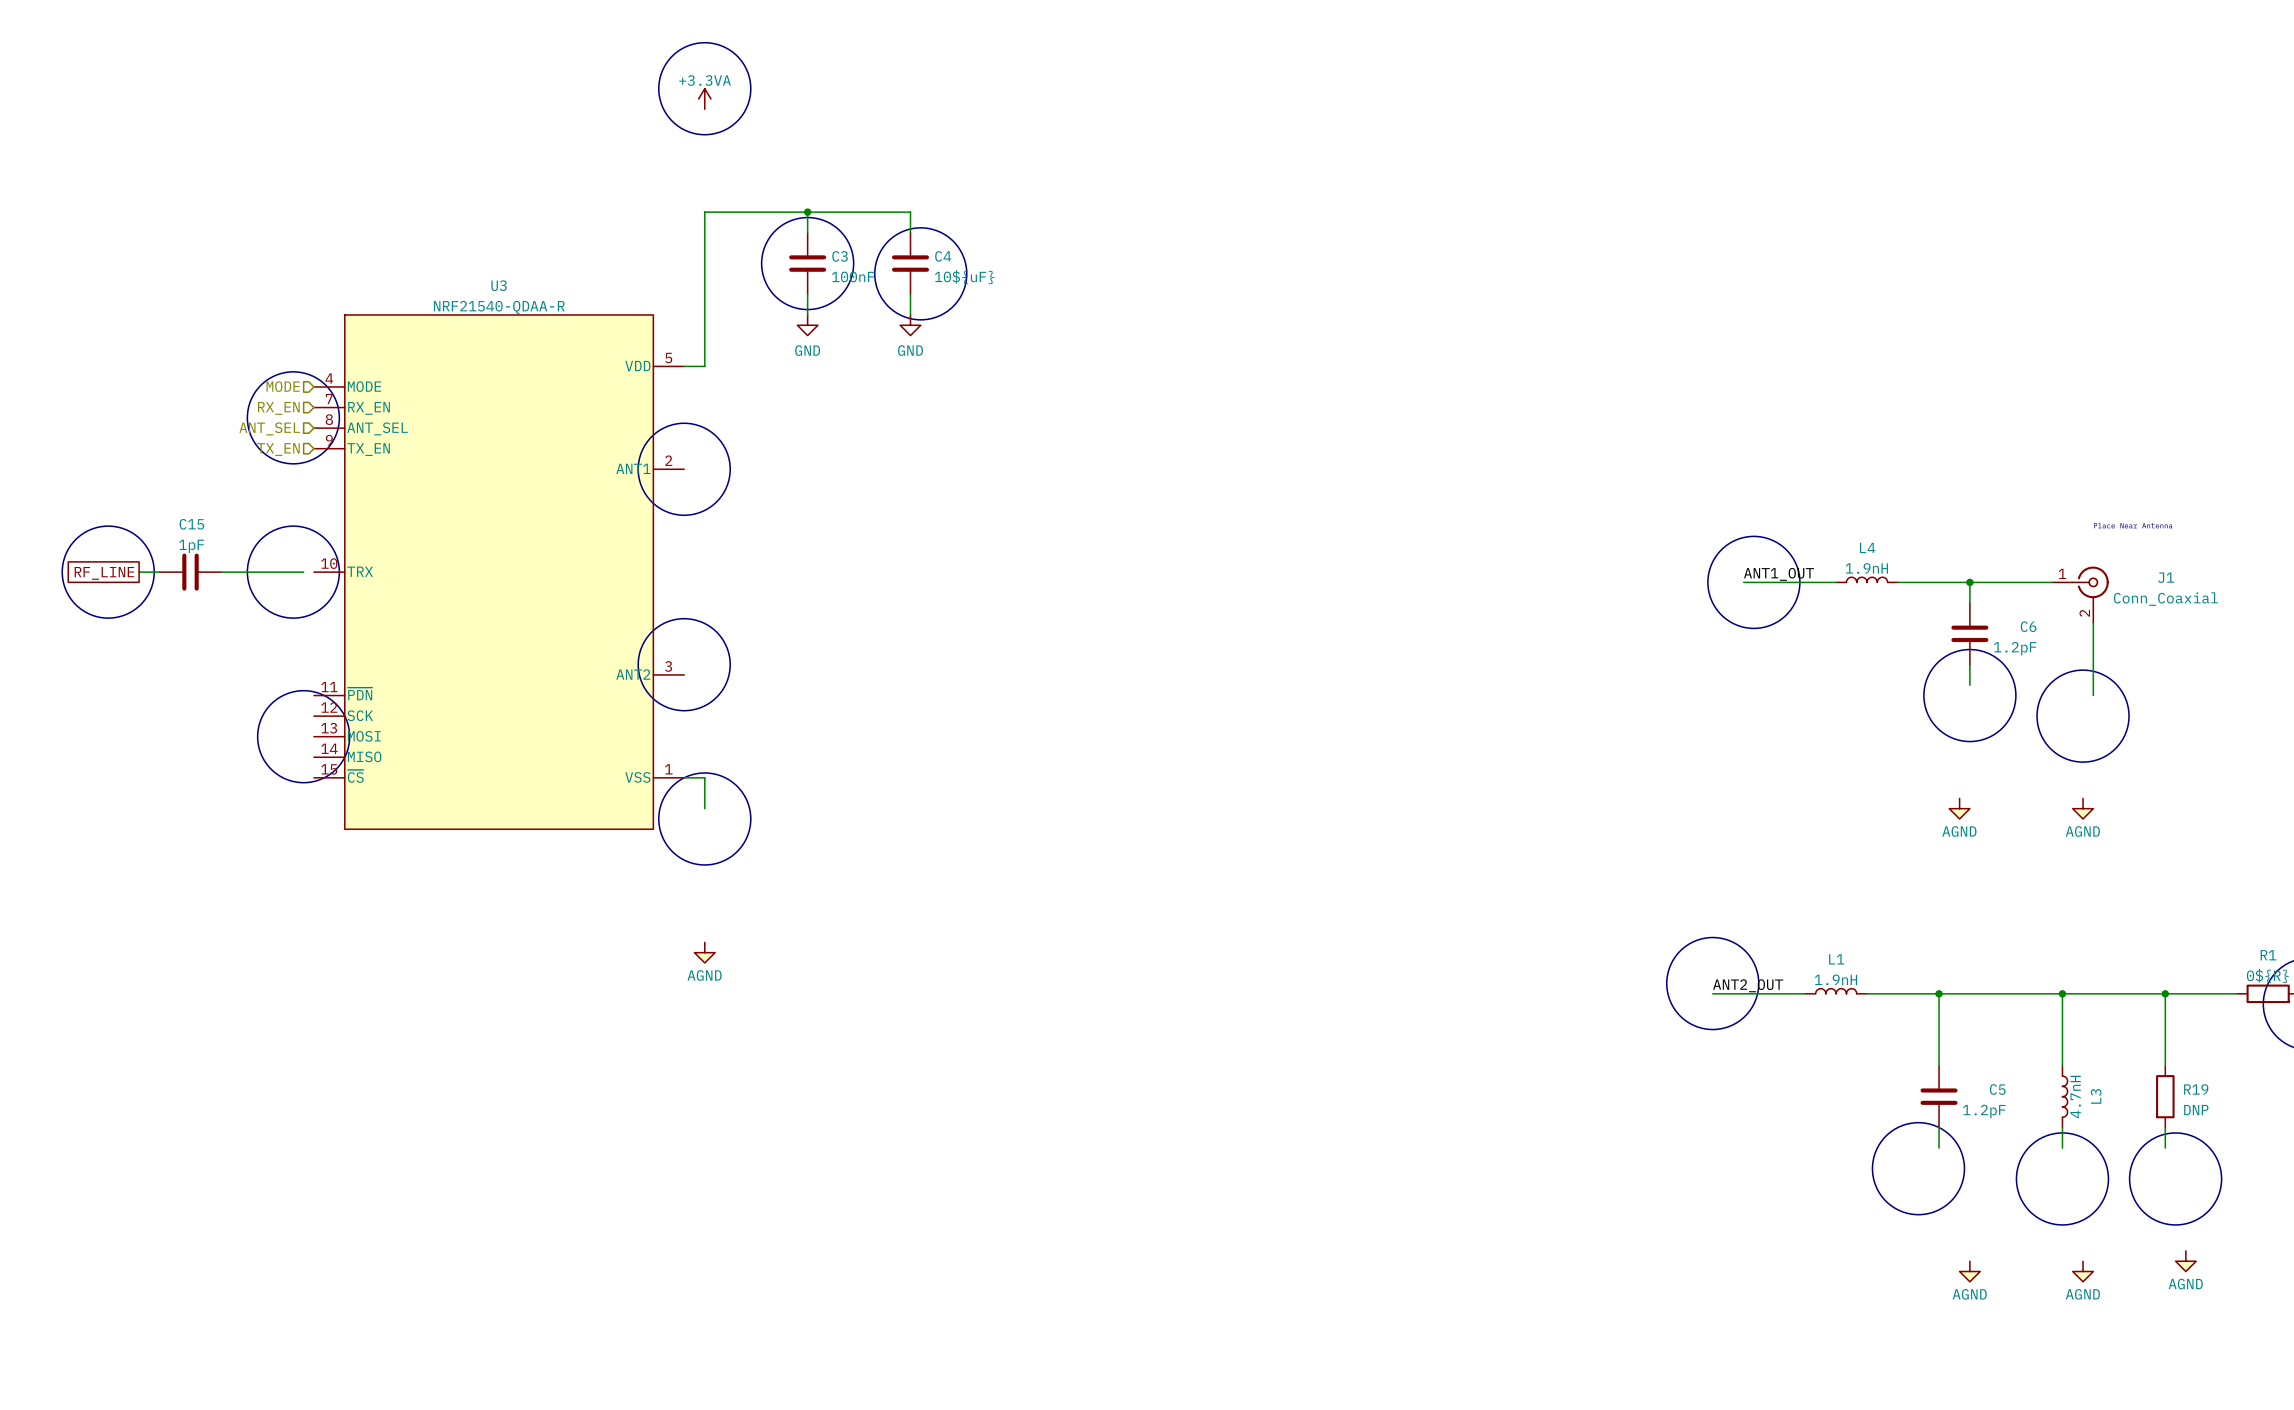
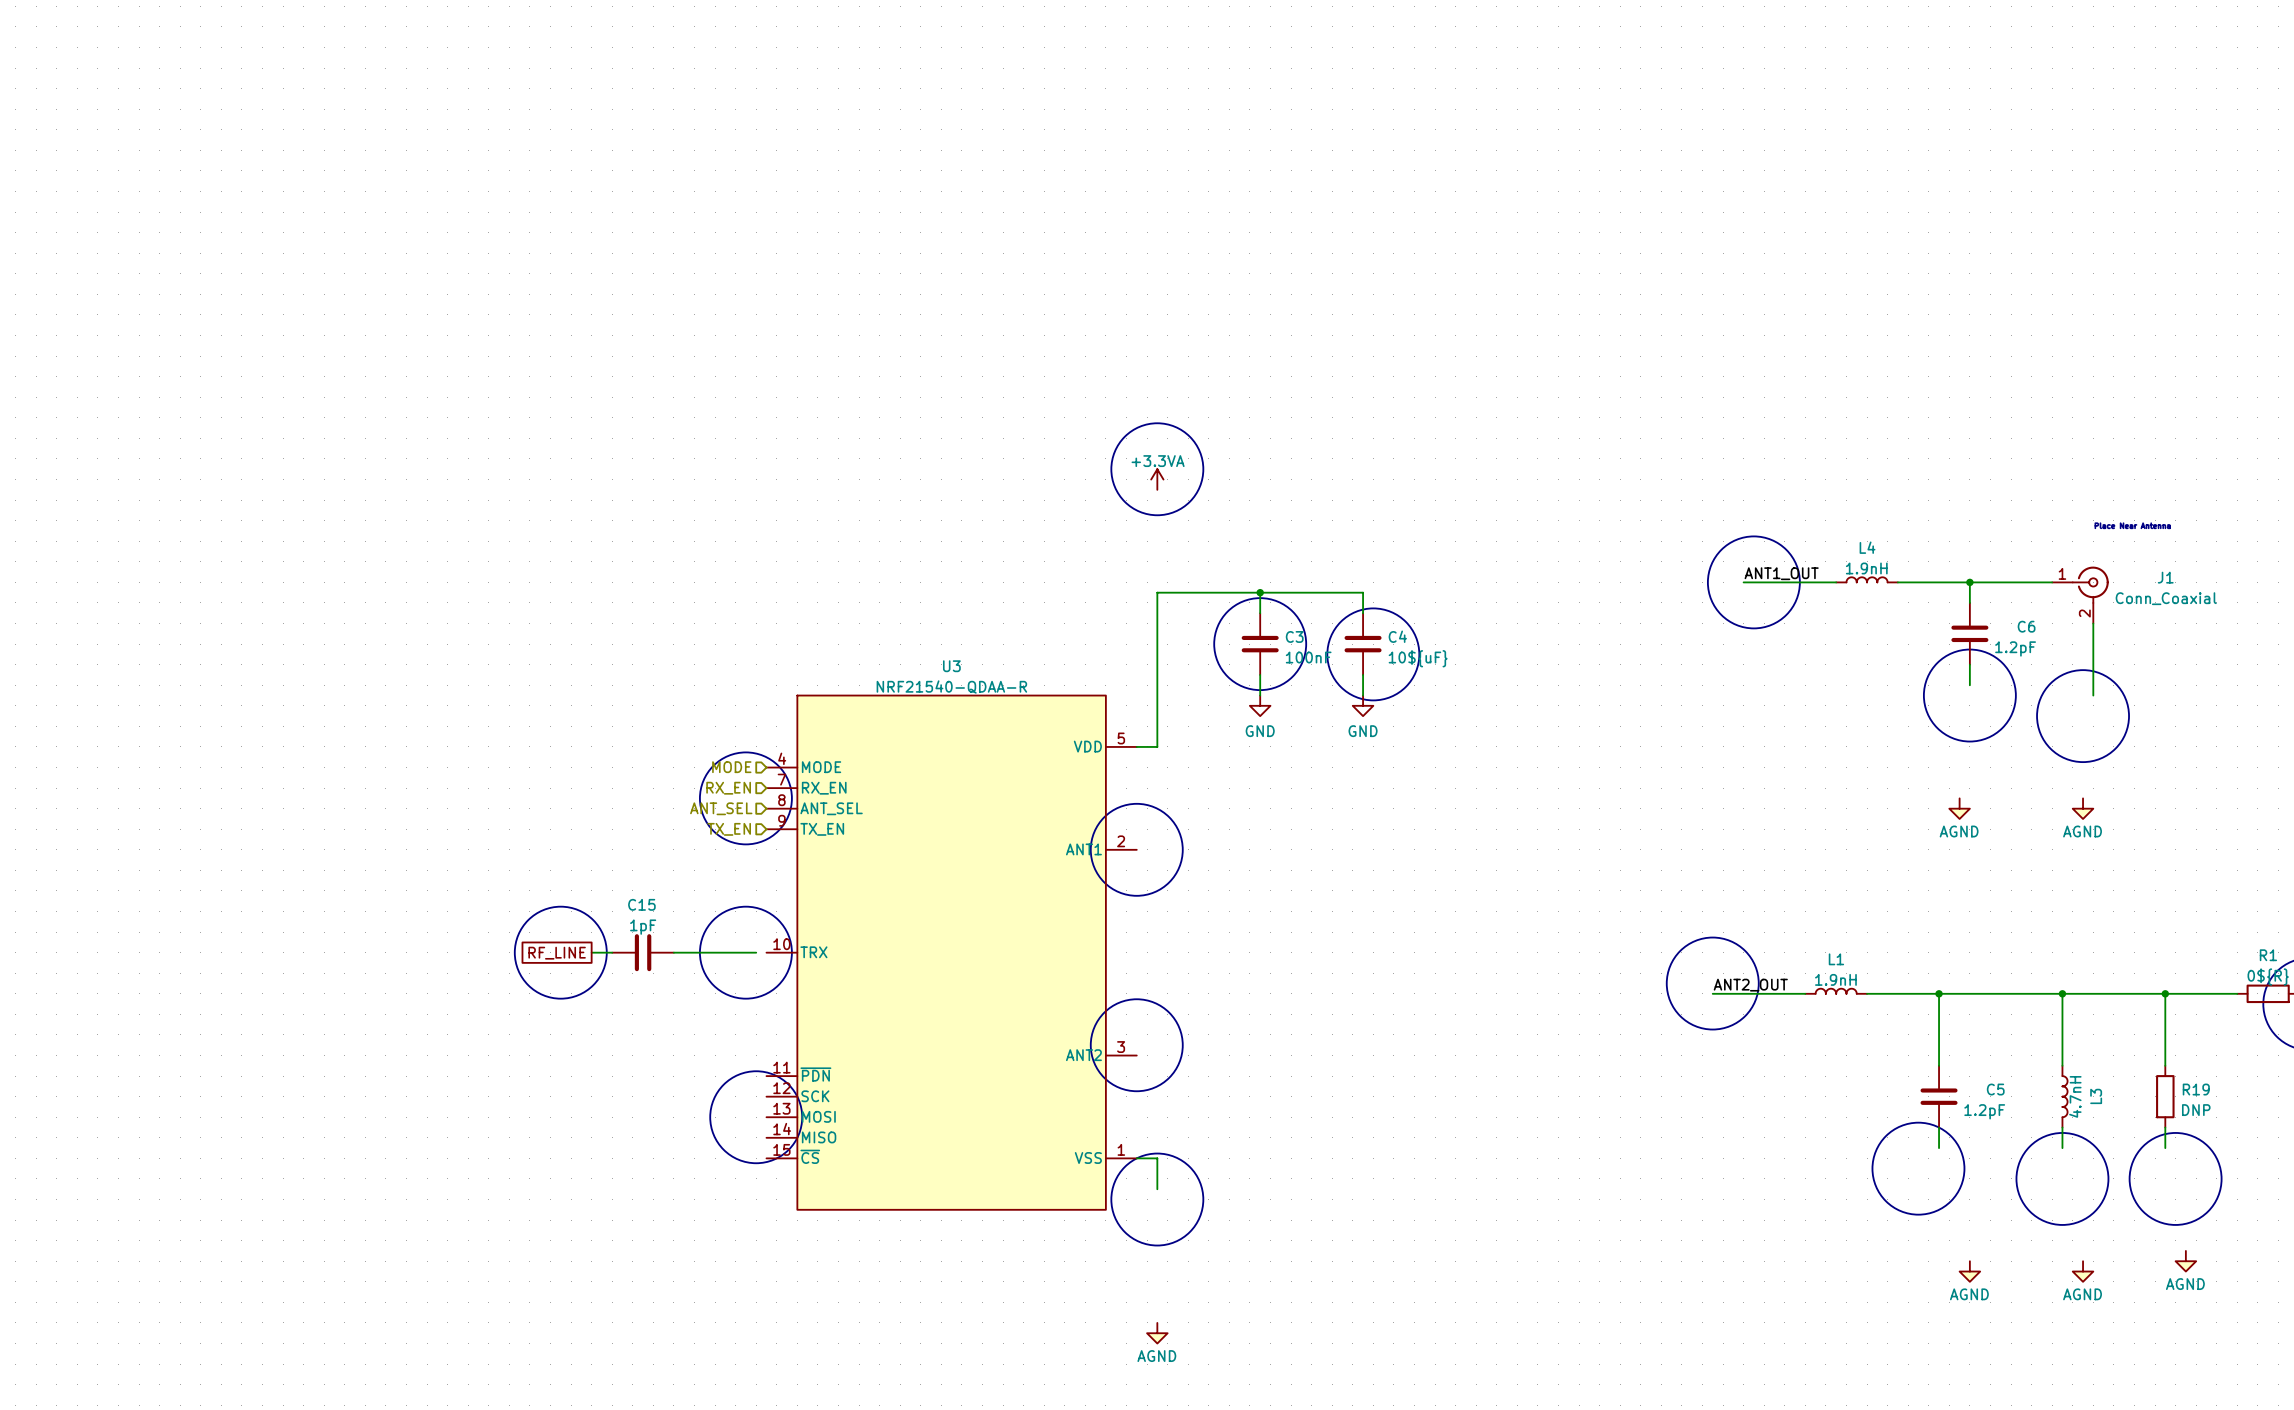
drawing: [658, 42, 751, 135] -> none
power symbol: +3.3VA (704, 98) -> none
wire: (807, 212) (807, 232) -> none
junction: (807, 212) -> none
drawing: [761, 217, 854, 310] -> none
drawing: [874, 227, 967, 320] -> none
wire: (910, 232) (910, 212) (704, 212) (704, 366) (684, 366) -> none
C3 position: (807, 263) -> (1260, 644)
C4 position: (910, 263) -> (1363, 644)
wire: (807, 294) (807, 314) -> none
wire: (910, 294) (910, 314) -> none
power symbol: GND (807, 325) -> none
power symbol: GND (910, 325) -> none
drawing: [247, 371, 340, 464] -> none
hierarchical label: MODE (283, 386) -> none
hierarchical label: RX_EN (278, 408) -> none
drawing: [638, 423, 731, 516] -> none
drawing: none -> [1111, 423, 1204, 516]
hierarchical label: ANT_SEL (269, 428) -> none
hierarchical label: TX_EN (278, 449) -> none
power symbol: none -> +3.3VA (1157, 479)
drawing: [62, 526, 155, 619] -> none
drawing: [247, 526, 340, 619] -> none
wire: (139, 572) (159, 572) -> none
C15 position: (190, 572) -> (643, 952)
wire: (221, 572) (303, 572) -> none
U3 position: (499, 572) -> (951, 952)
global label: RF_LINE (104, 573) -> none
wire: none -> (1260, 592) (1260, 613)
junction: none -> (1260, 592)
drawing: none -> [1214, 598, 1307, 691]
drawing: none -> [1327, 608, 1420, 701]
wire: none -> (1363, 613) (1363, 592) (1157, 592) (1157, 746) (1136, 746)
drawing: [638, 618, 731, 711] -> none
wire: none -> (1260, 674) (1260, 695)
wire: none -> (1363, 674) (1363, 695)
drawing: [257, 690, 350, 783] -> none
power symbol: none -> GND (1260, 705)
power symbol: none -> GND (1363, 705)
hierarchical label: none -> MODE (731, 767)
wire: (684, 777) (704, 777) (704, 808) -> none
hierarchical label: none -> RX_EN (728, 788)
drawing: none -> [1090, 803, 1183, 896]
hierarchical label: none -> ANT_SEL (721, 808)
drawing position: (704, 818) -> (745, 798)
hierarchical label: none -> TX_EN (729, 829)
drawing: none -> [514, 906, 607, 999]
drawing: none -> [699, 906, 792, 999]
wire: none -> (591, 952) (612, 952)
wire: none -> (673, 952) (756, 952)
power symbol: AGND (704, 952) -> none
global label: none -> RF_LINE (557, 953)
drawing: none -> [1090, 999, 1183, 1092]
drawing: none -> [710, 1071, 803, 1164]
drawing: none -> [1111, 1153, 1204, 1246]
wire: none -> (1136, 1158) (1157, 1158) (1157, 1189)
power symbol: none -> AGND (1157, 1333)

